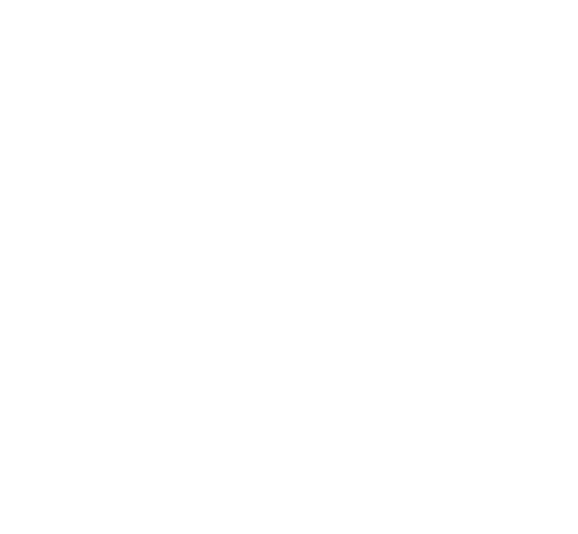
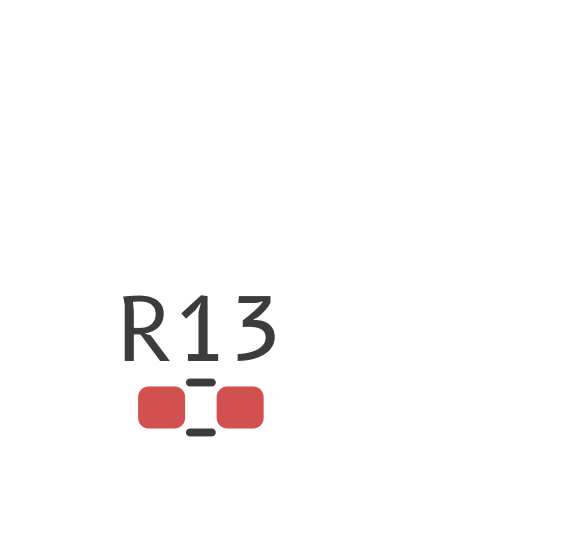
R13: none -> (200, 407)

